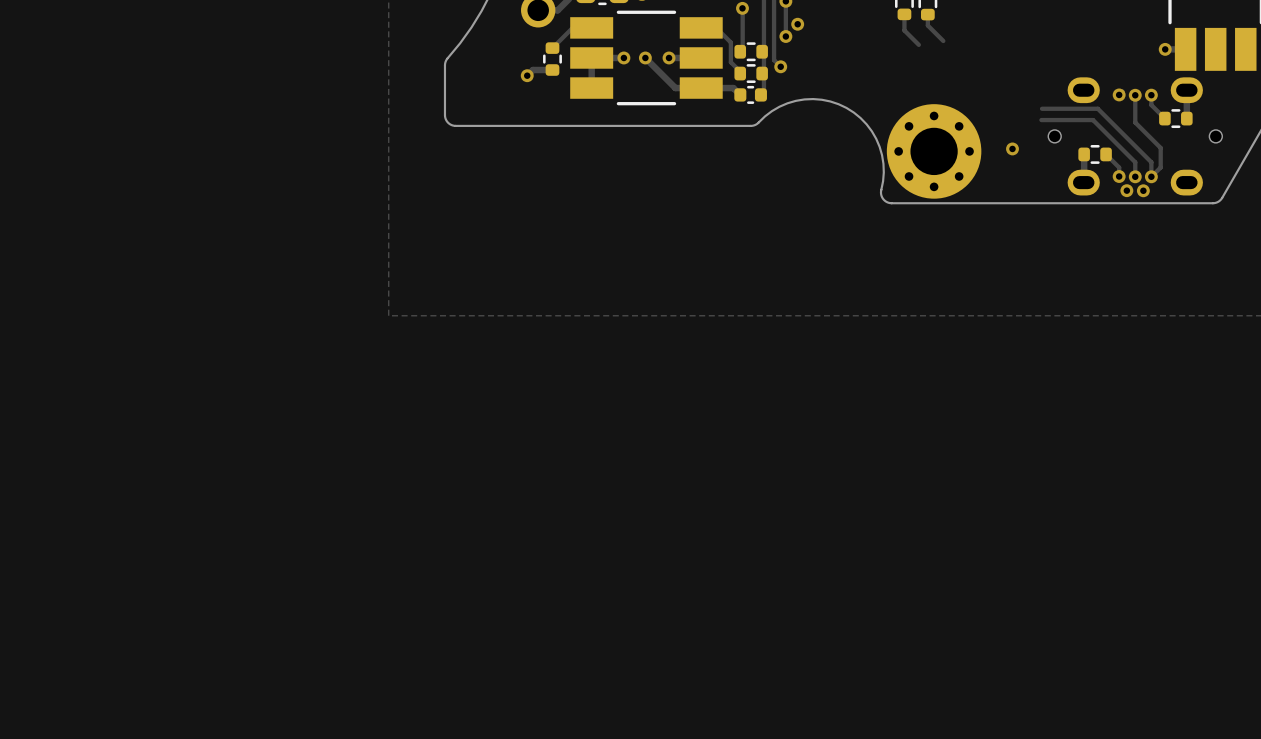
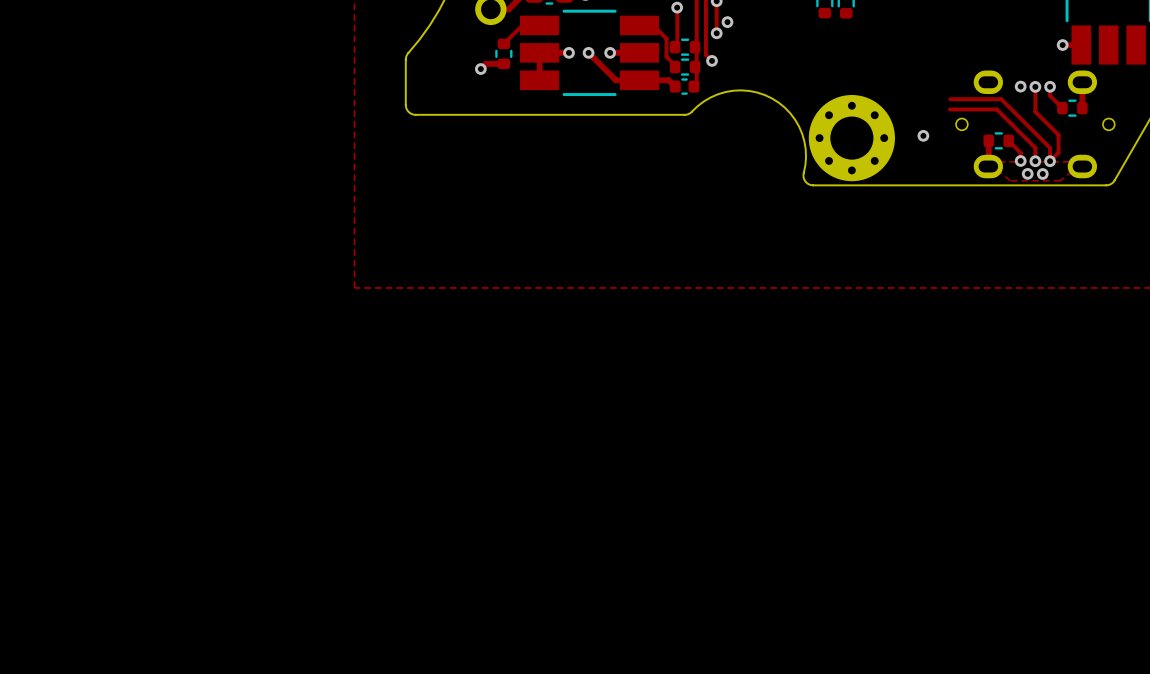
track: (904, 14) (904, 30) (918, 44) -> none
track: (927, 14) (927, 25) (943, 41) -> none
zone outline: none -> (998, 161) (1072, 161) (1072, 171) (1060, 180) (1010, 180) (998, 171) (998, 161)

